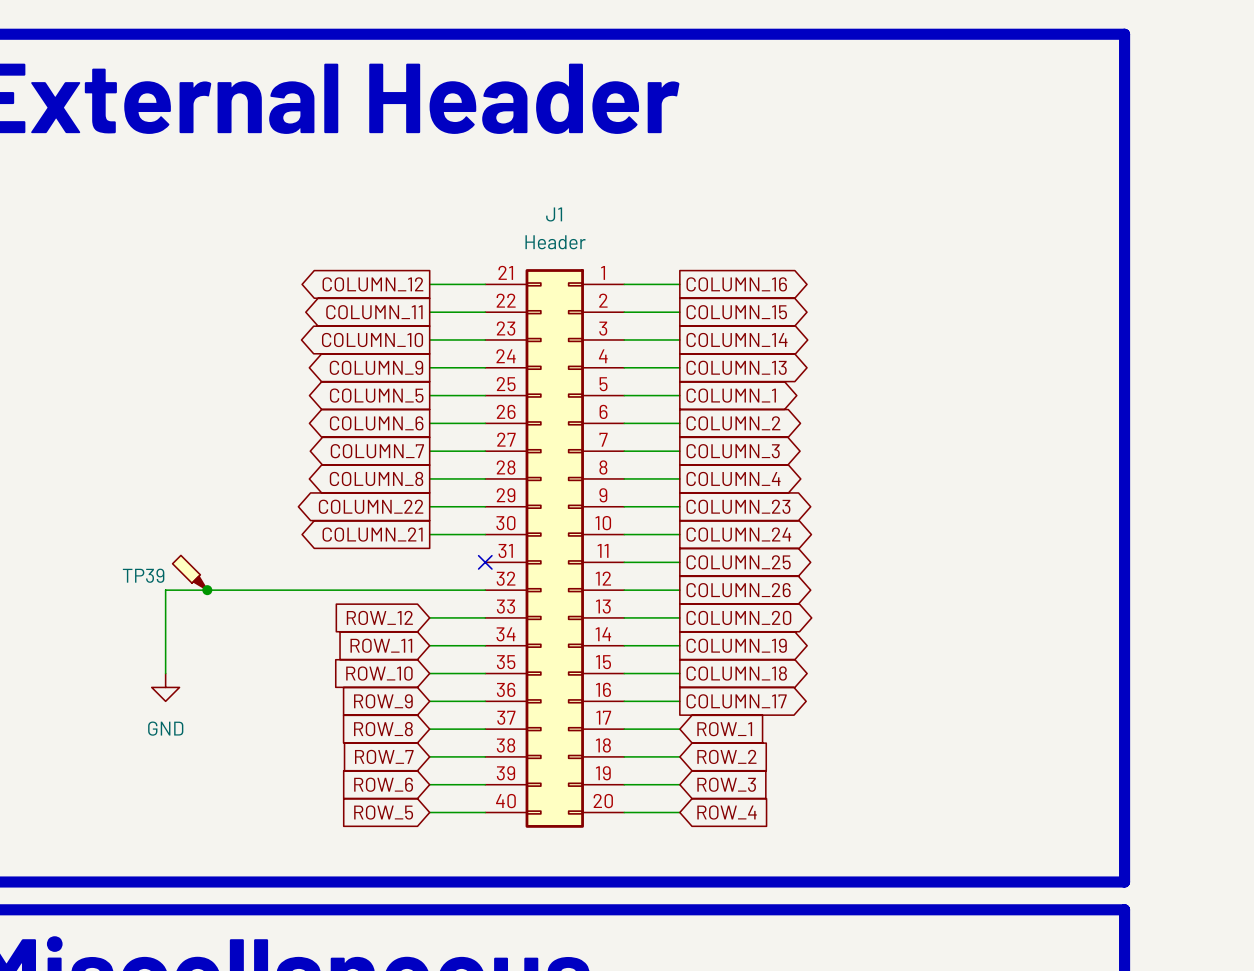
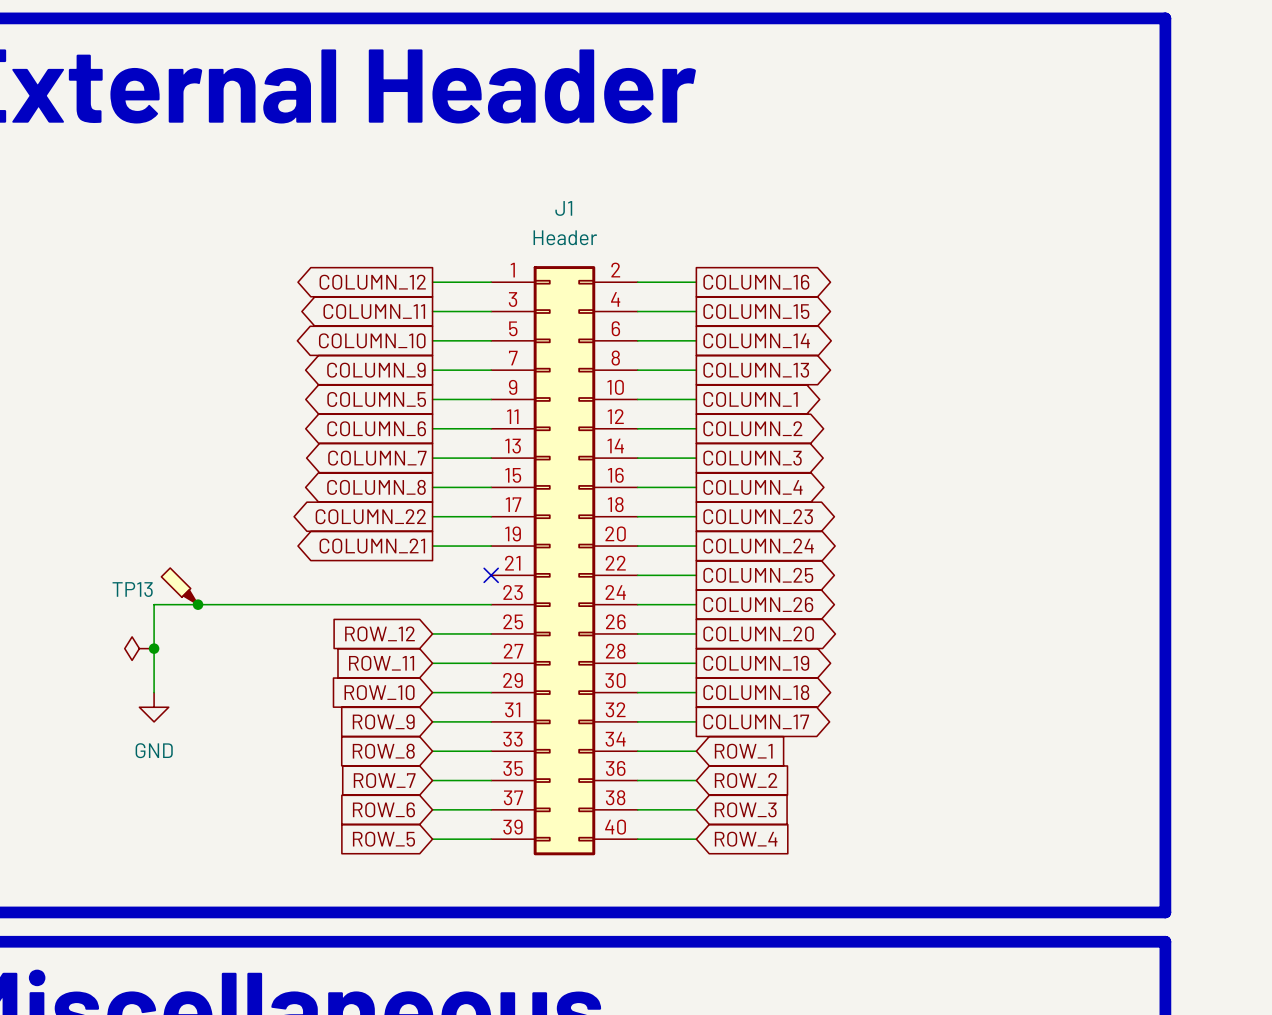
J1 symbol: [485, 269, 625, 828] -> [491, 266, 638, 856]
TP39 name: TP39 (143, 575) -> TP13 (132, 589)
power symbol: none -> (139, 648)
junction: none -> (154, 648)

